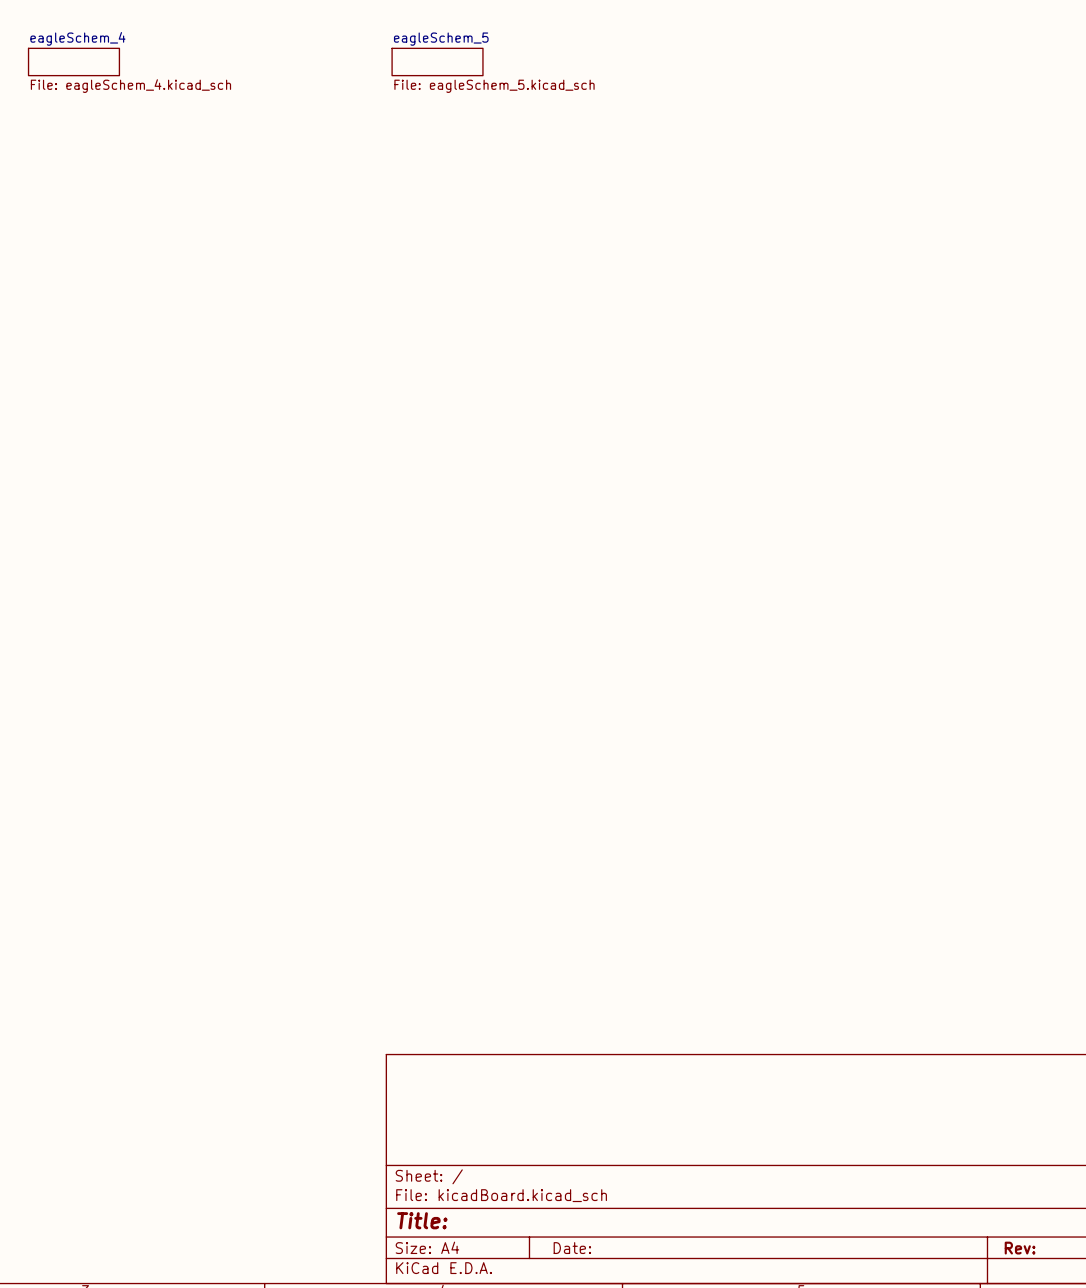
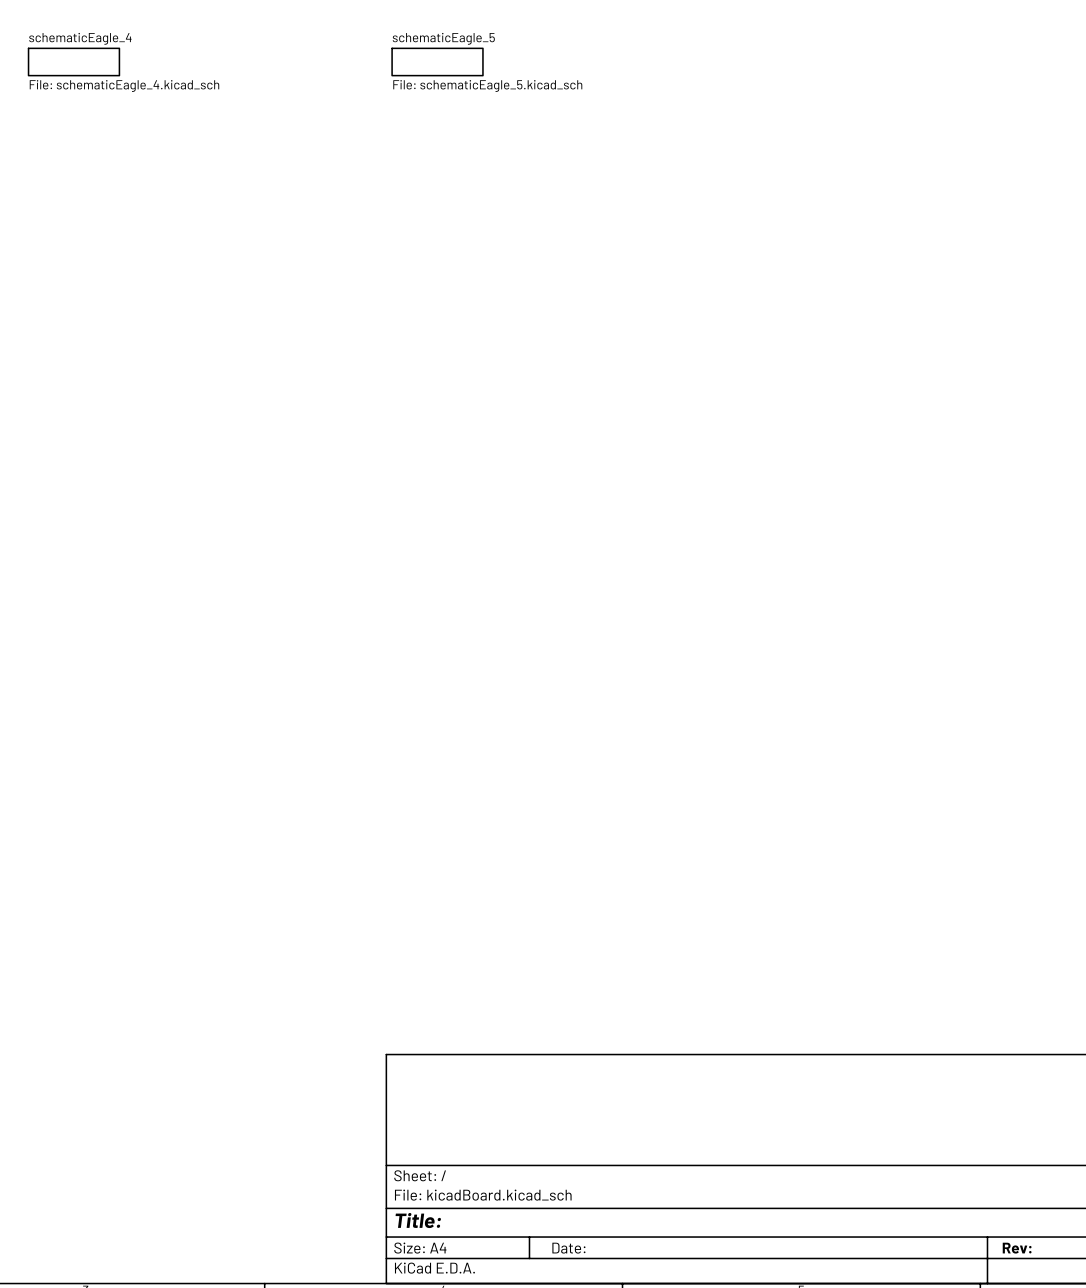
sheet eagleSchem_4 name: eagleSchem_4 (77, 38) -> schematicEagle_4 (80, 38)
sheet eagleSchem_5 name: eagleSchem_5 (441, 39) -> schematicEagle_5 (443, 38)
sheet eagleSchem_4 value: File: eagleSchem_4.kicad_sch (130, 86) -> File: schematicEagle_4.kicad_sch (124, 86)
sheet eagleSchem_5 value: File: eagleSchem_5.kicad_sch (494, 86) -> File: schematicEagle_5.kicad_sch (487, 86)

